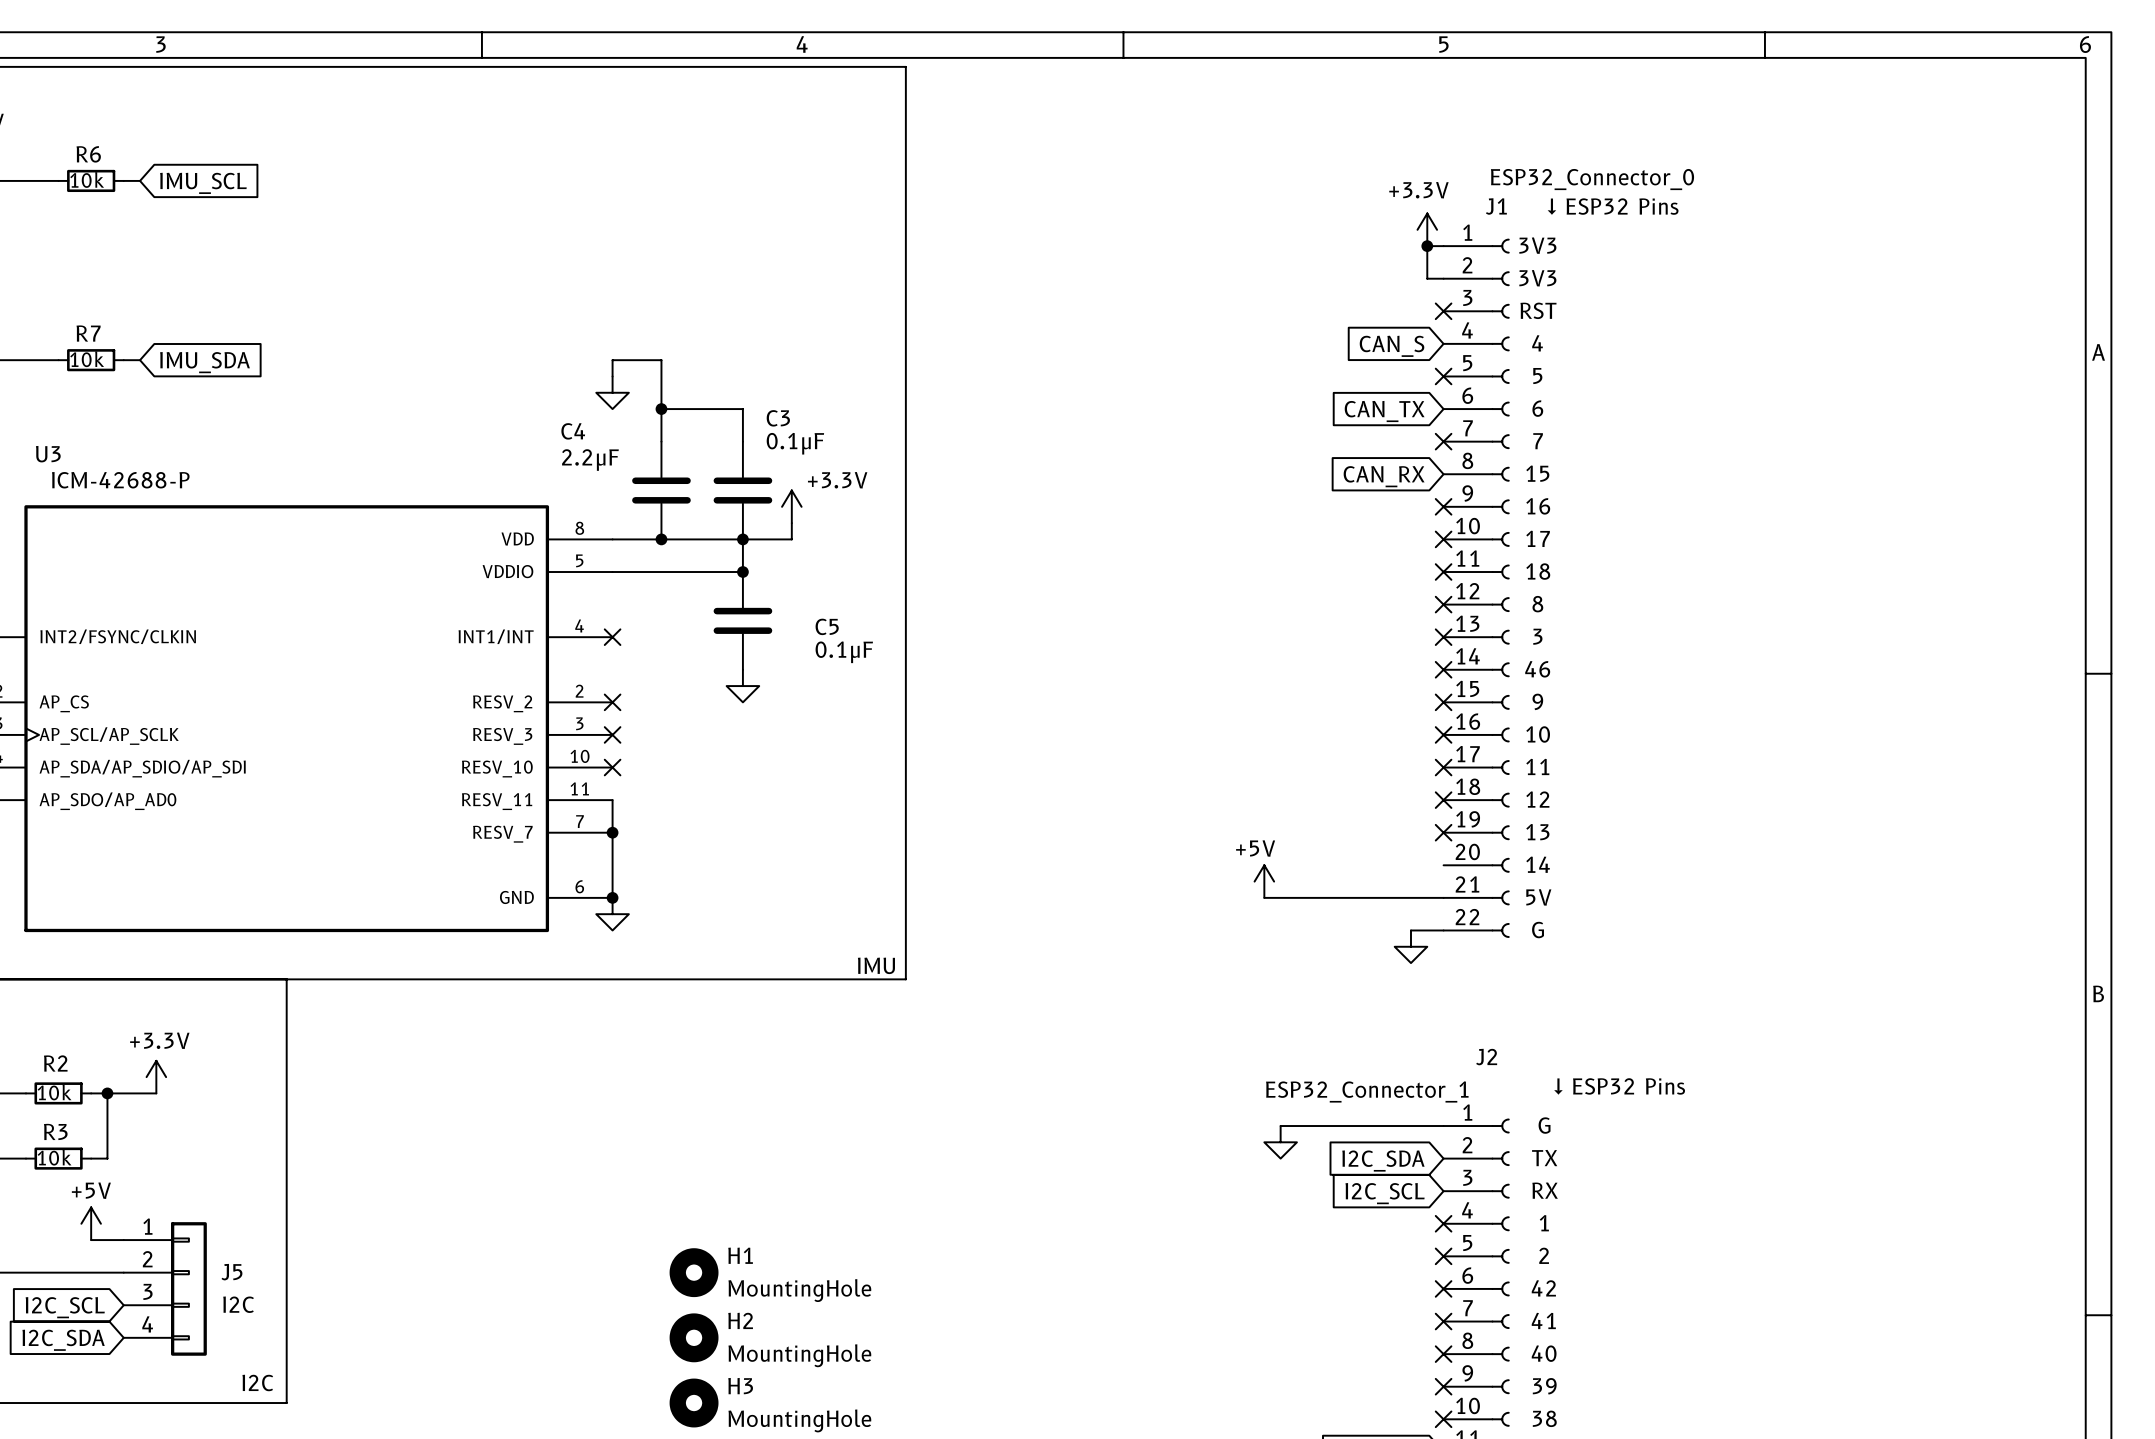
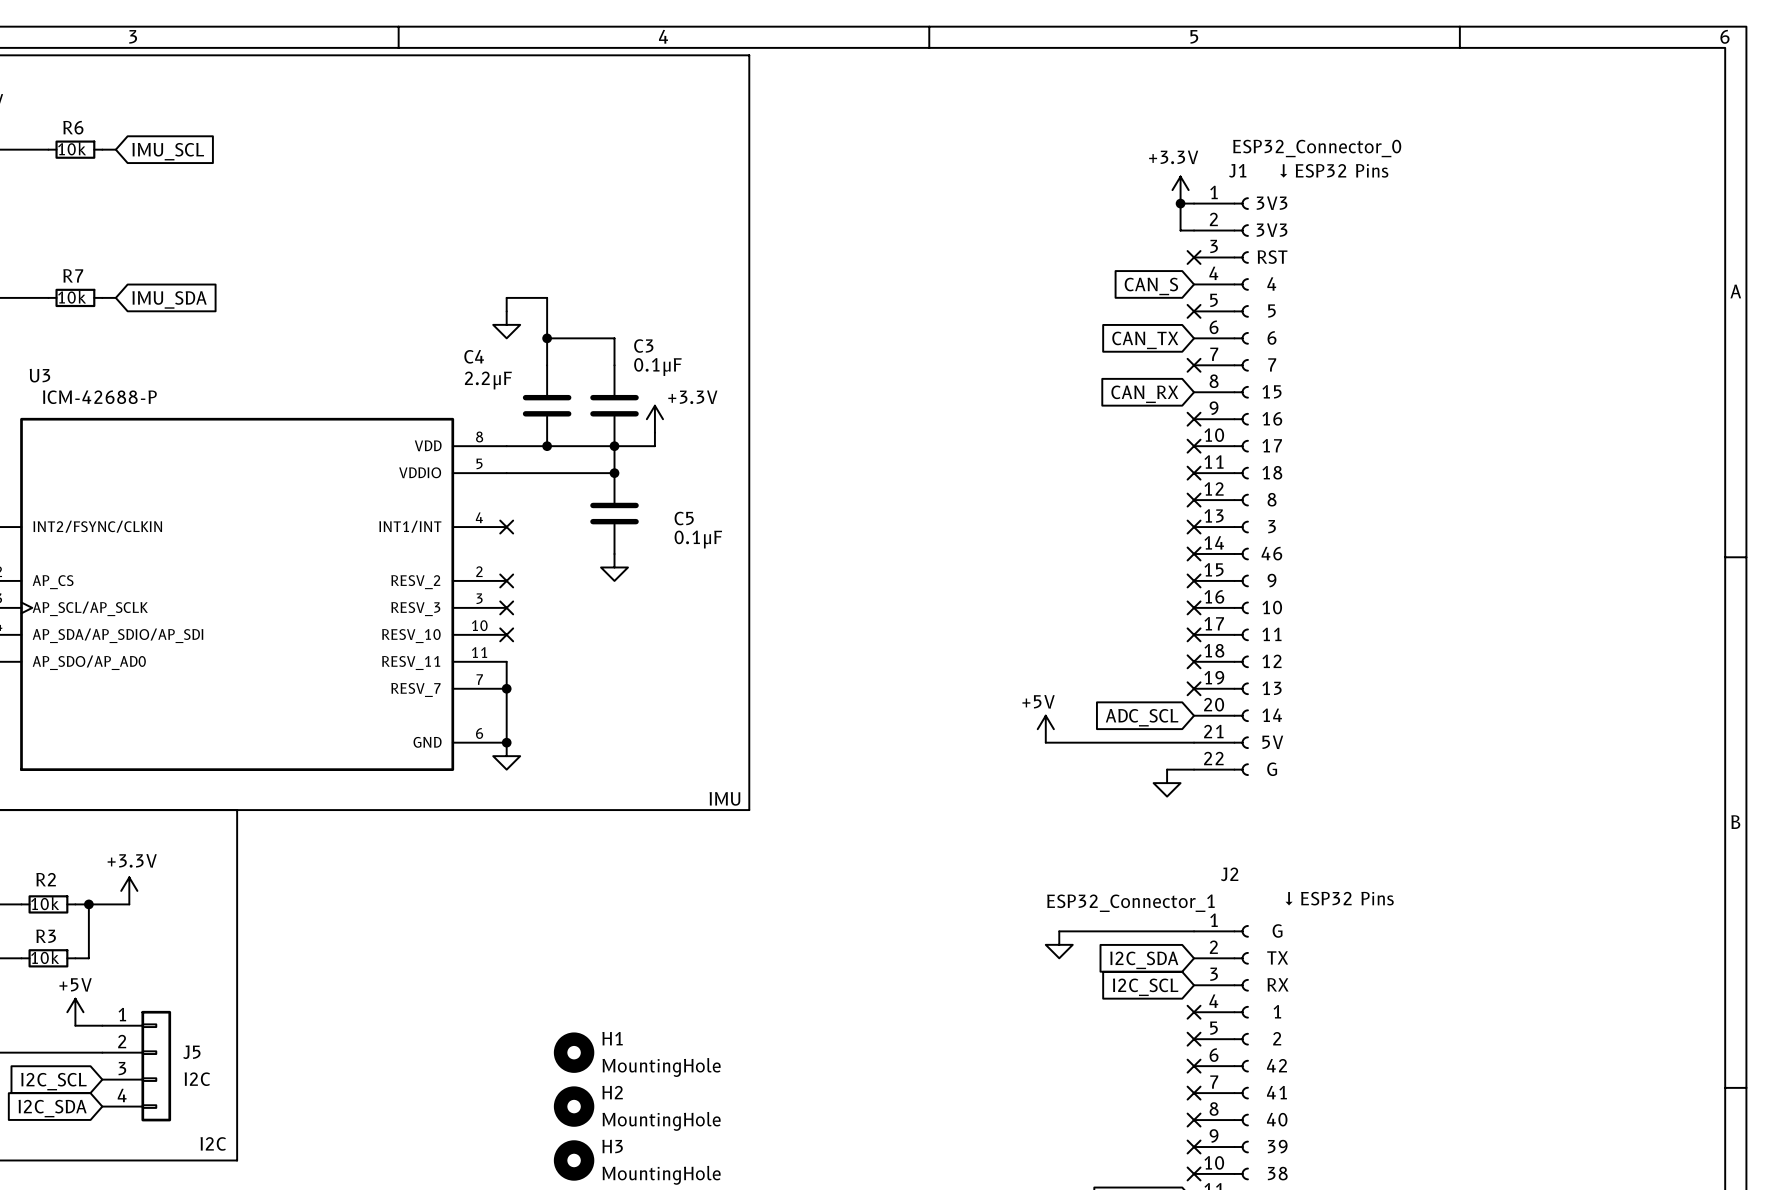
global label: none -> ADC_SCL (1142, 717)

